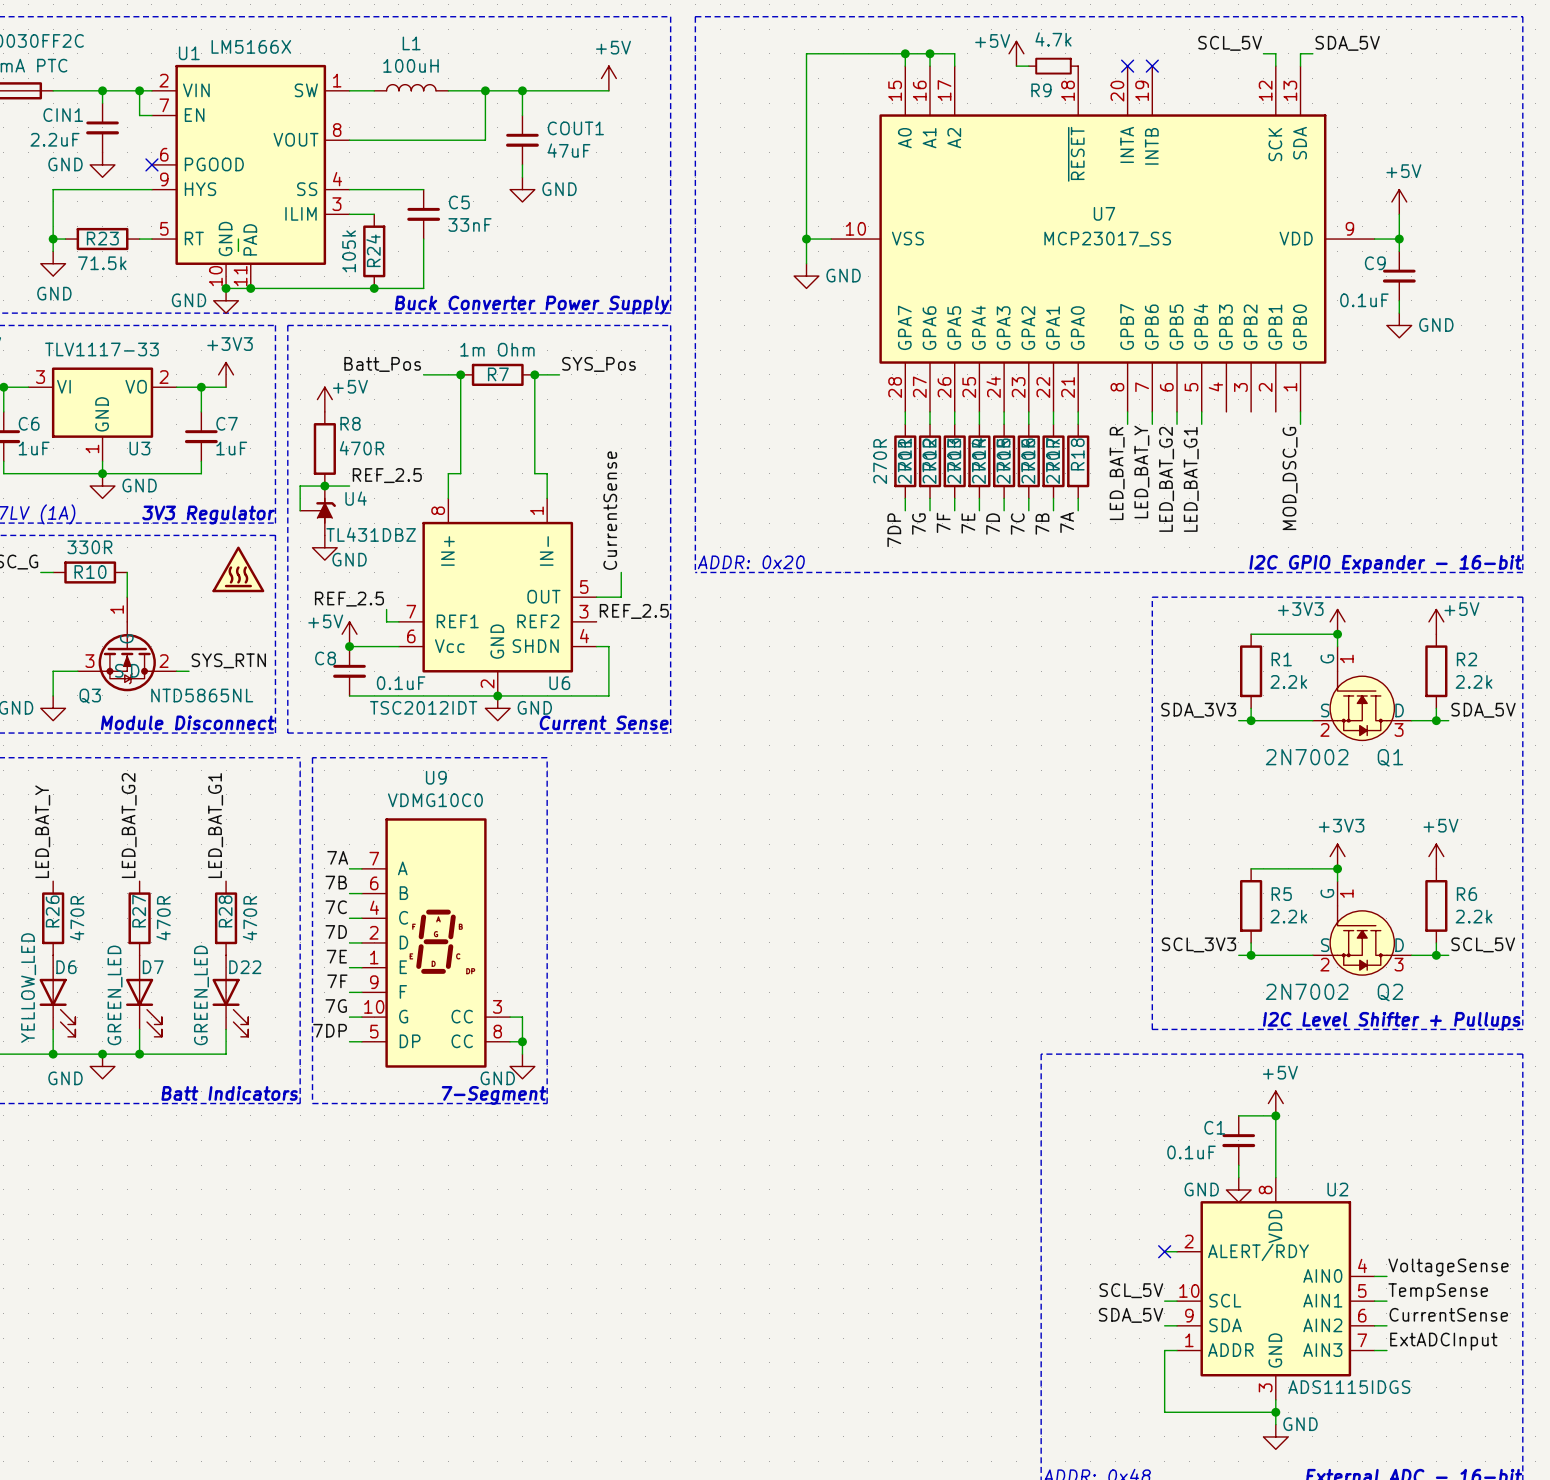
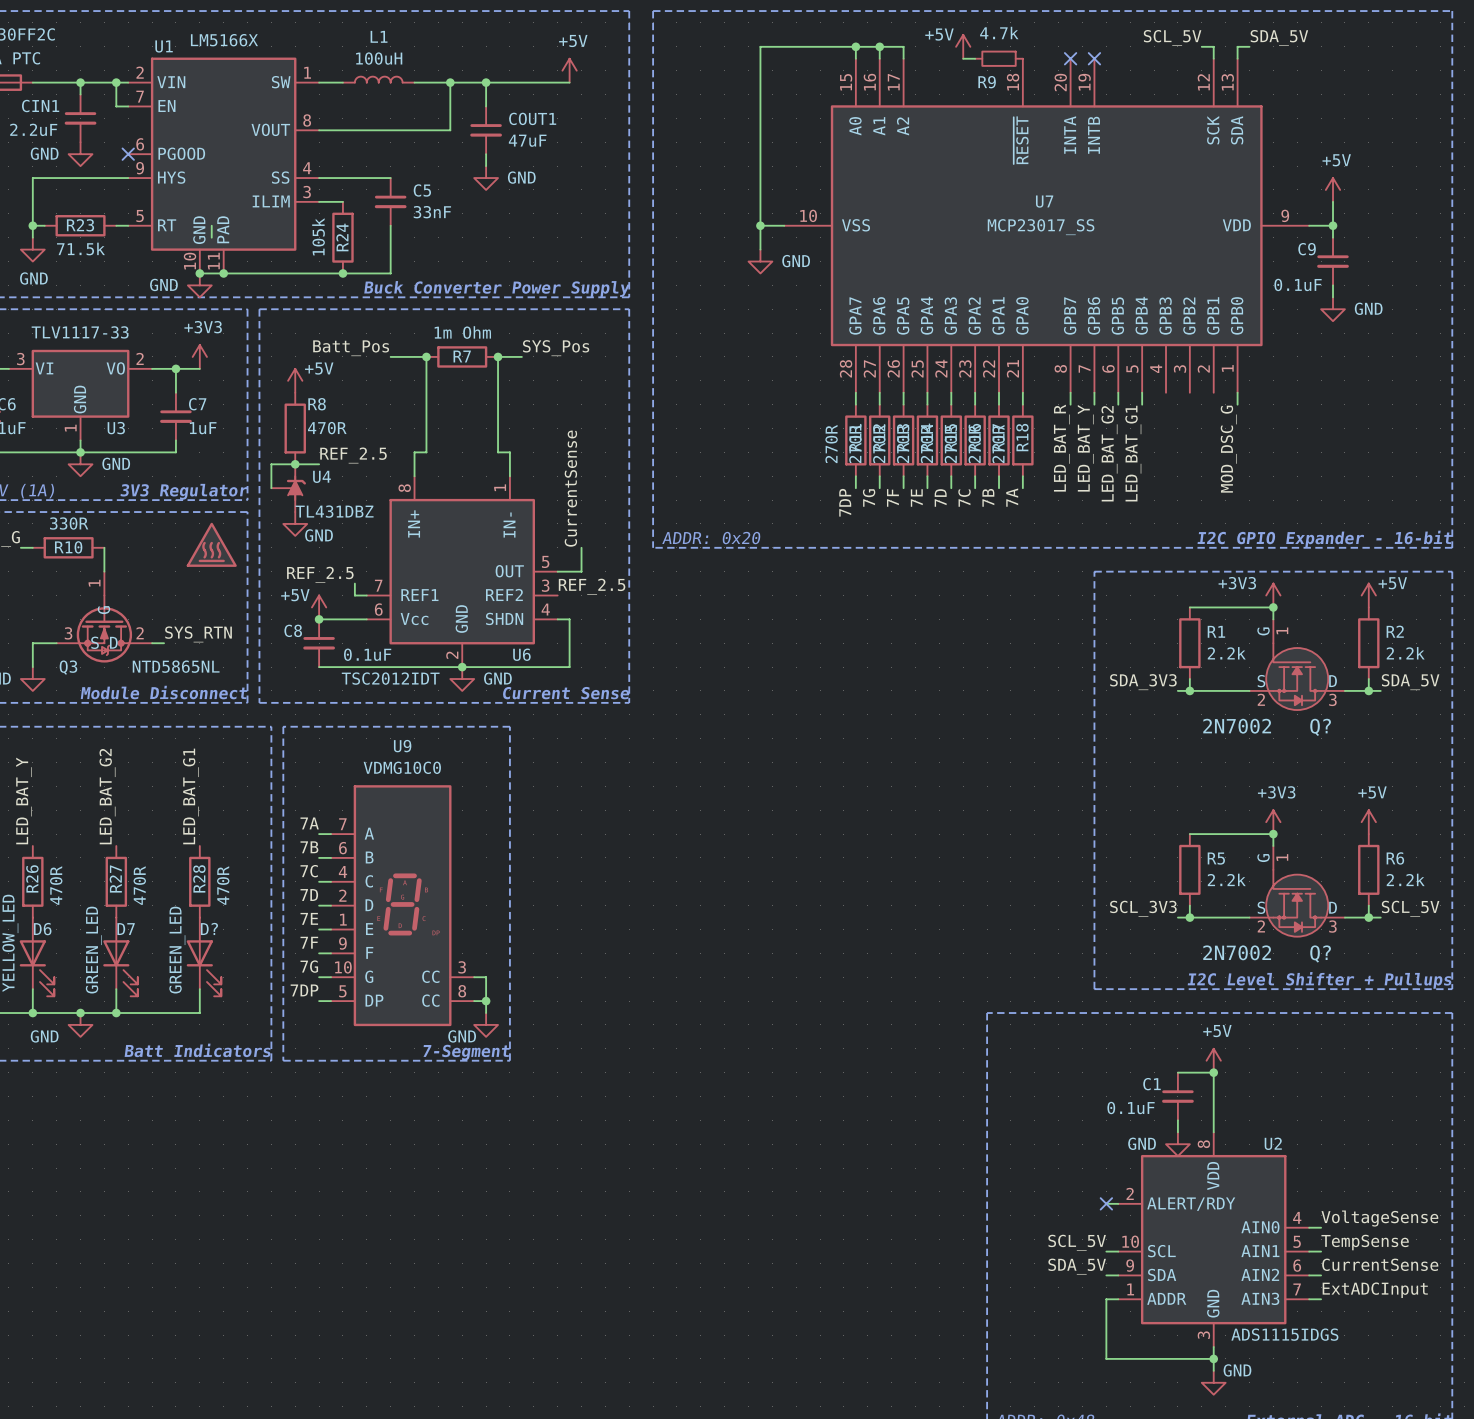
Q1 name: Q1 (1390, 757) -> Q? (1320, 727)
D22 name: D22 (245, 967) -> D? (209, 928)
Q2 name: Q2 (1390, 992) -> Q? (1320, 954)

